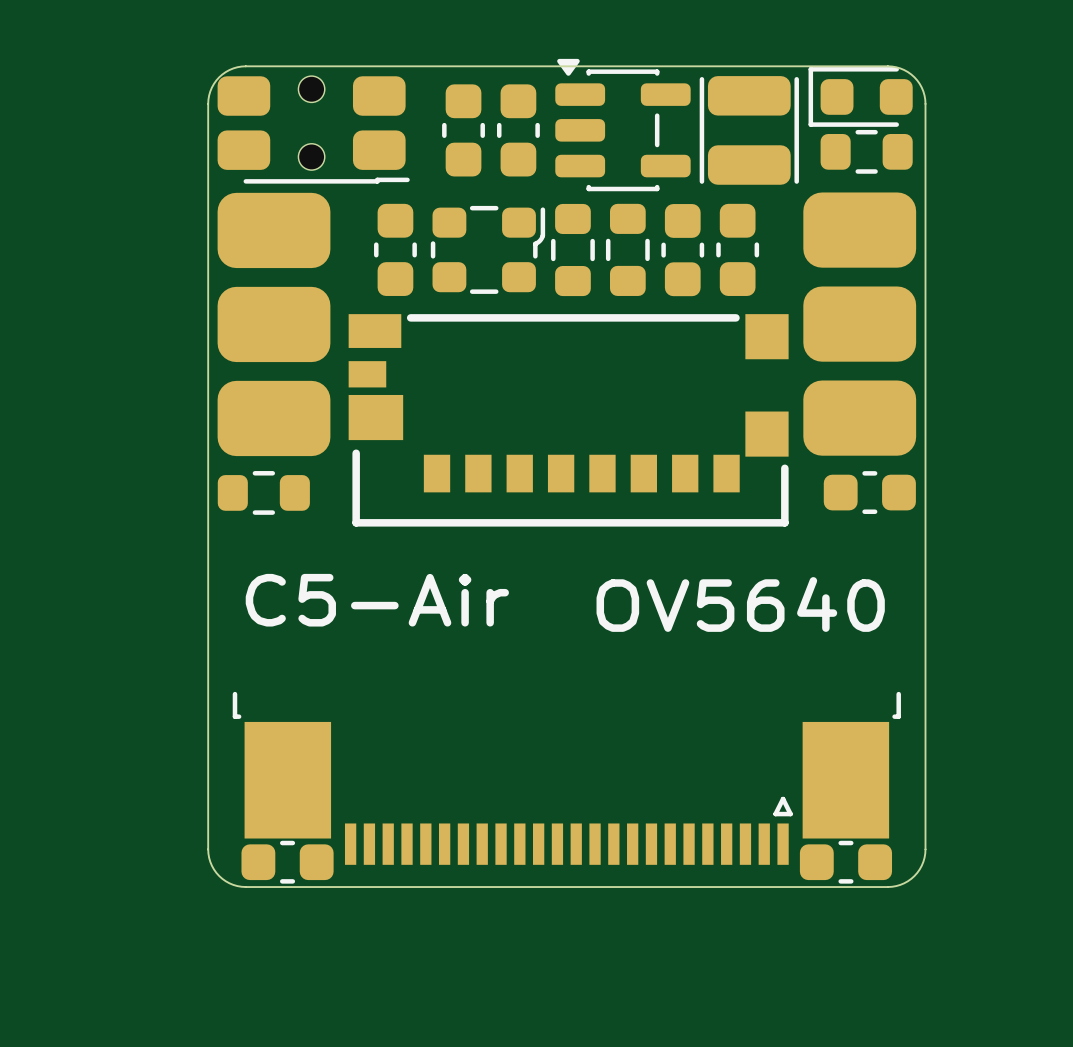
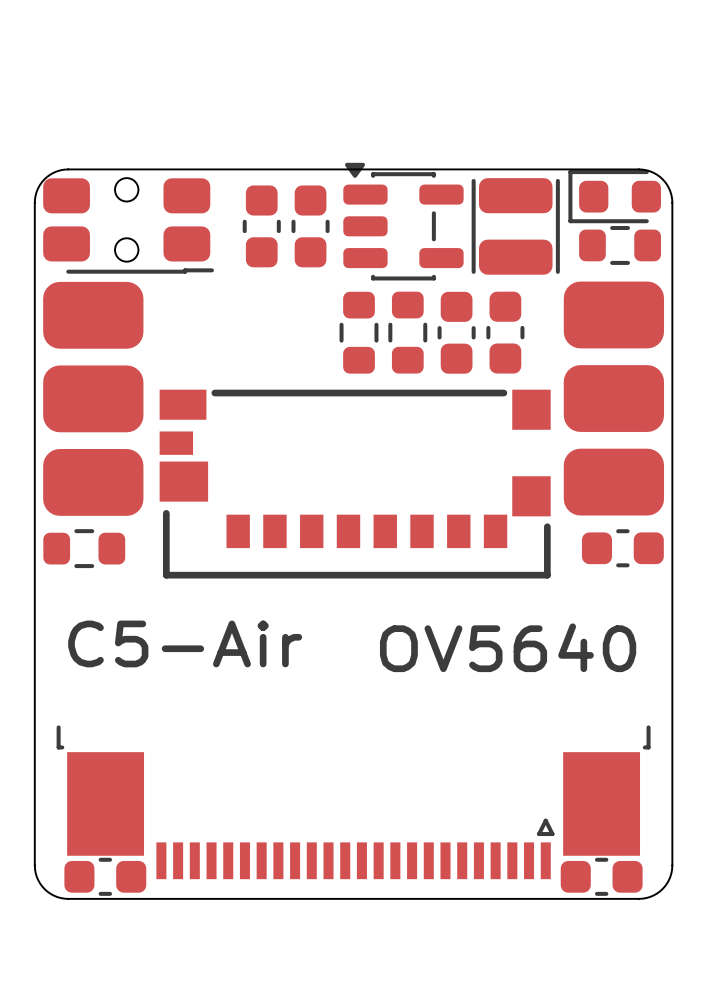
part: (395, 249) -> none
part: (487, 249) -> none

